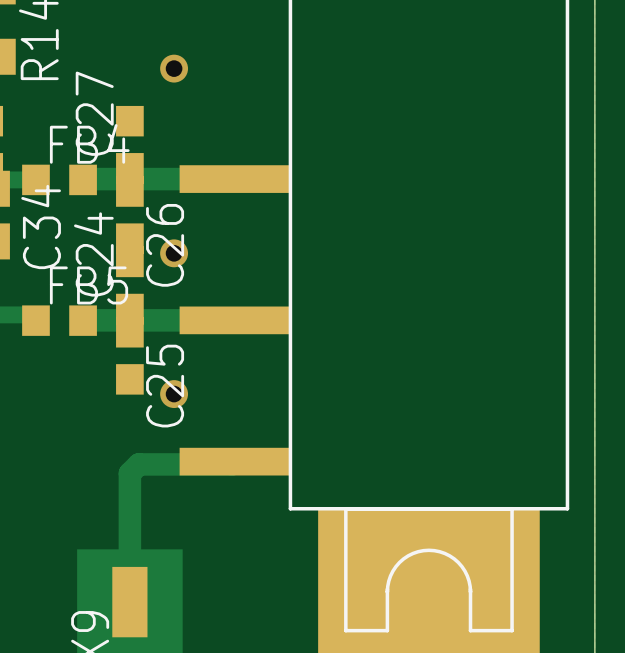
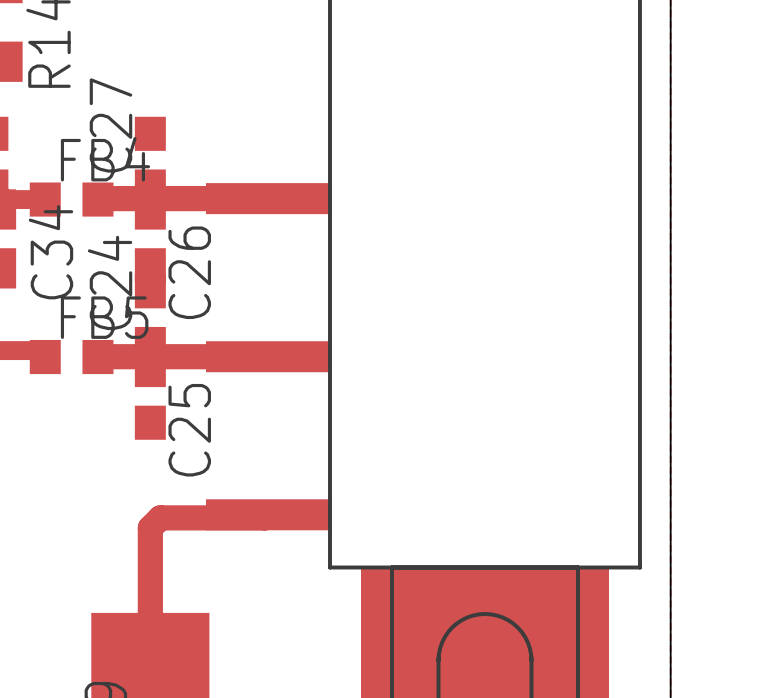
via: (174, 68) -> none
via: (174, 253) -> none
via: (174, 394) -> none

